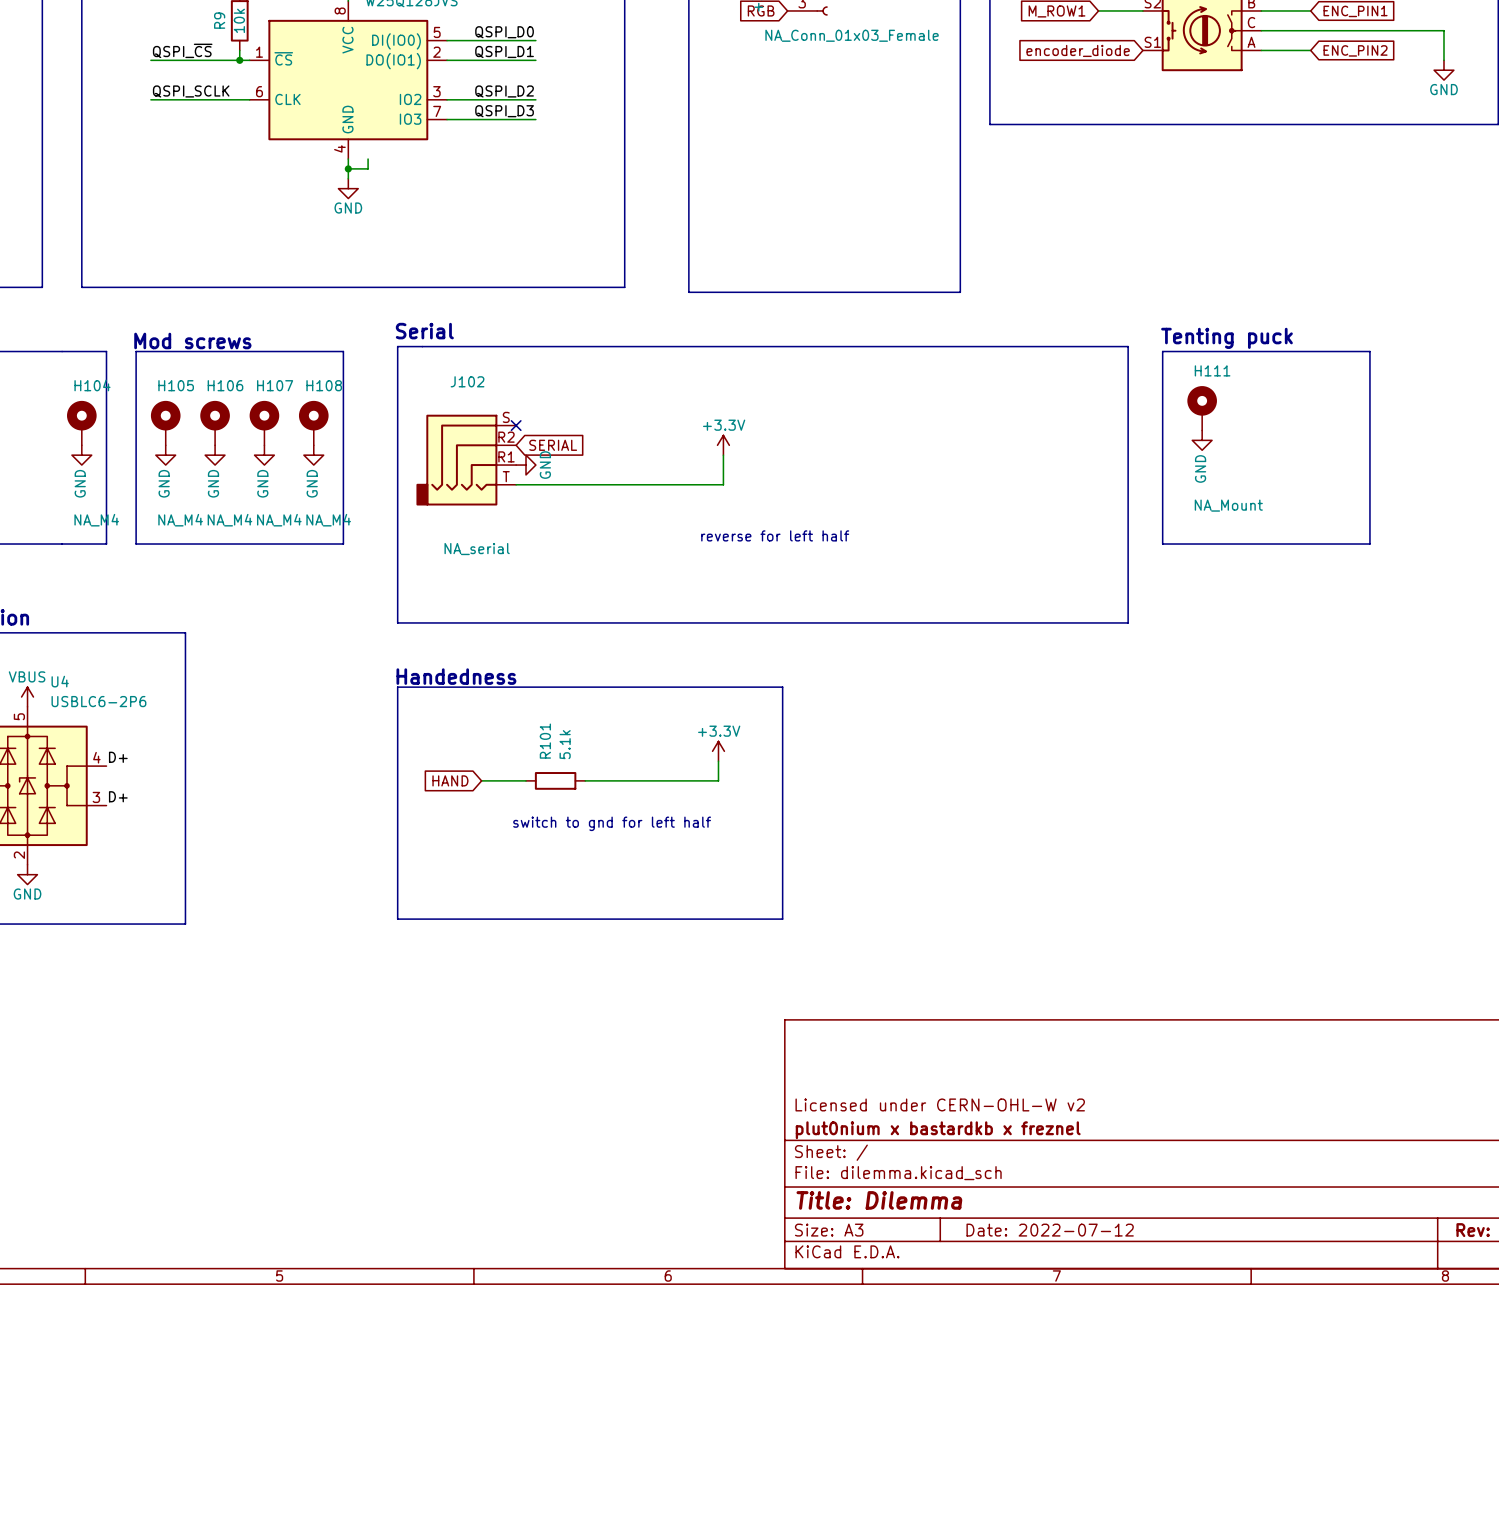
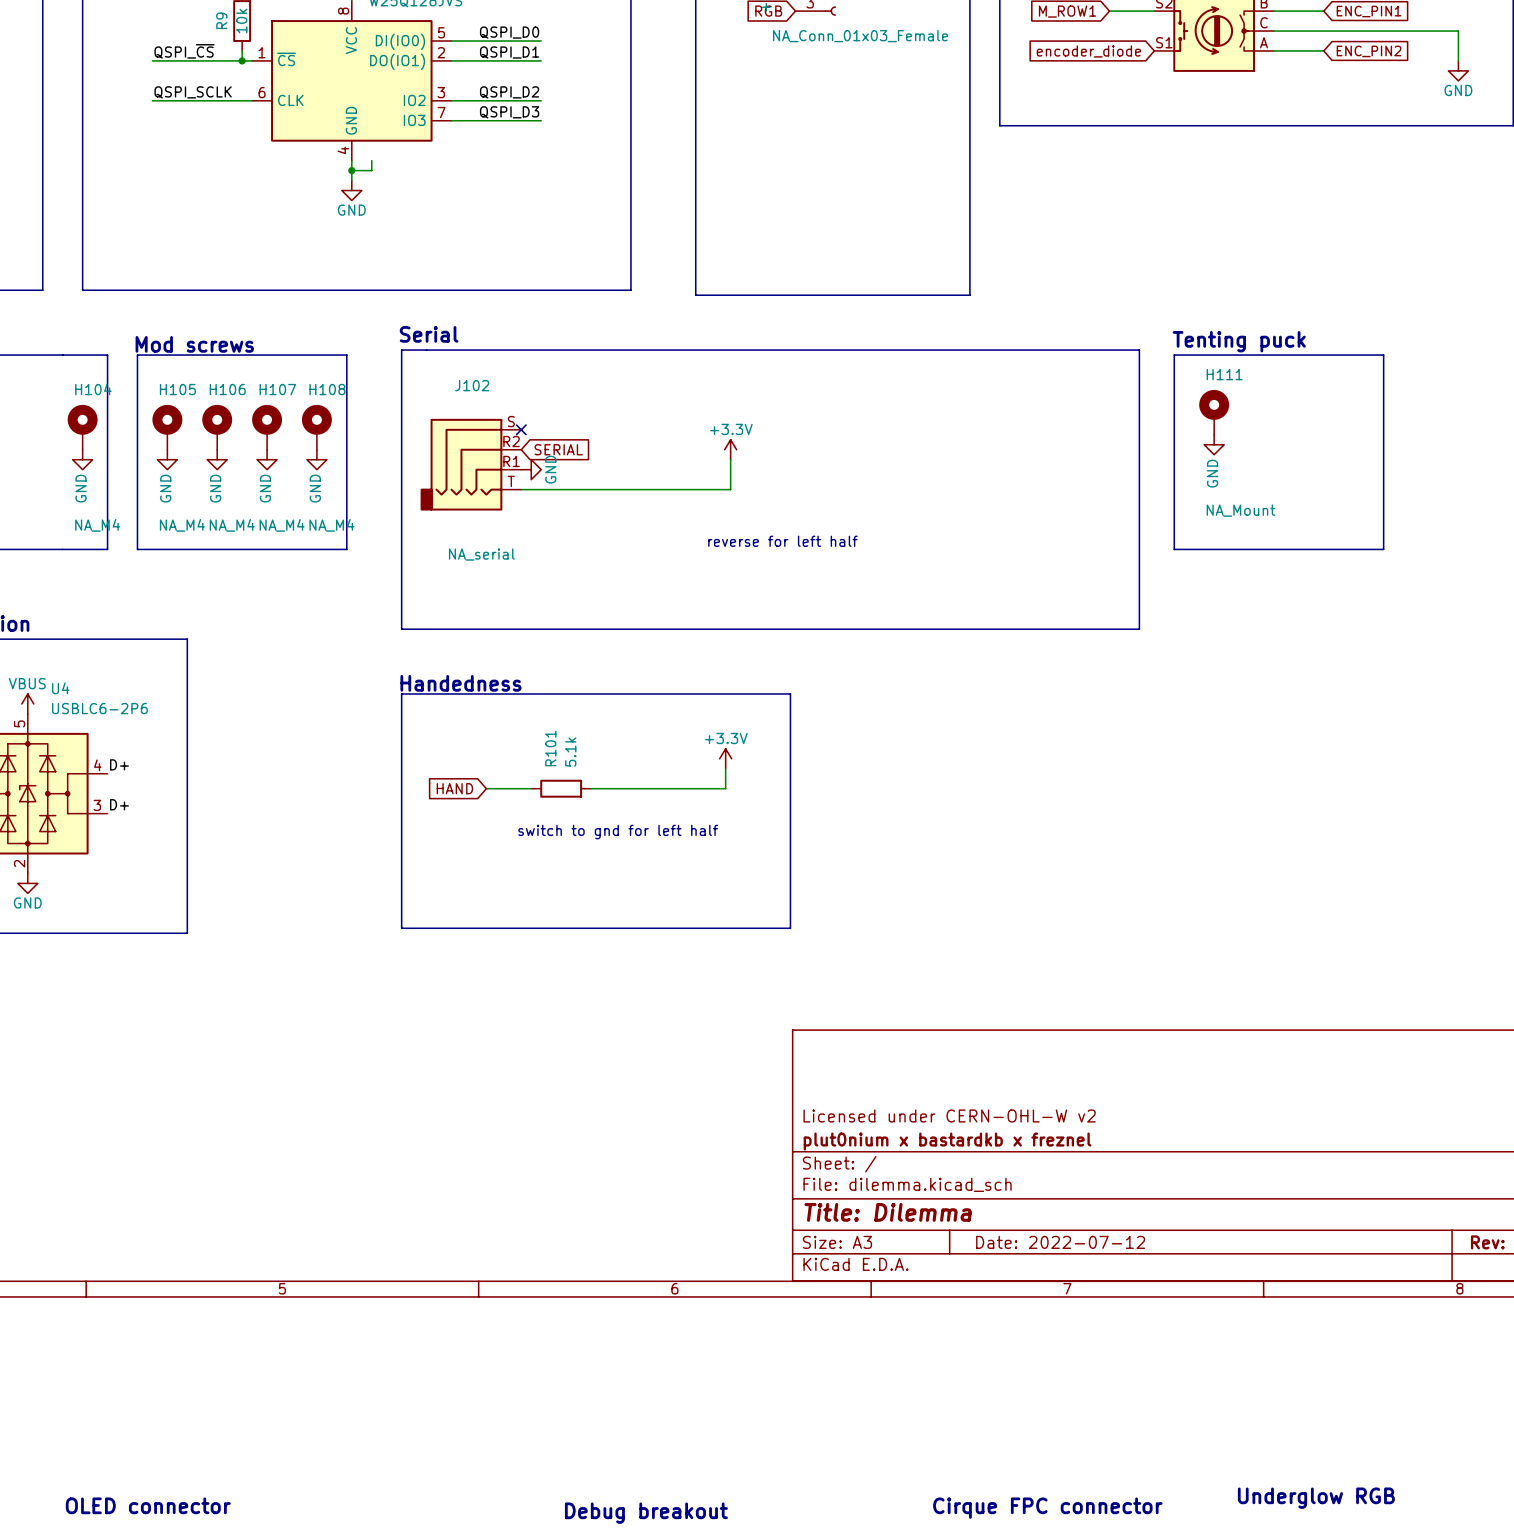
text: none -> Underglow RGB (1316, 1498)
text: none -> OLED connector (148, 1505)
text: none -> Cirque FPC connector (1047, 1508)
text: none -> Debug breakout (646, 1513)

